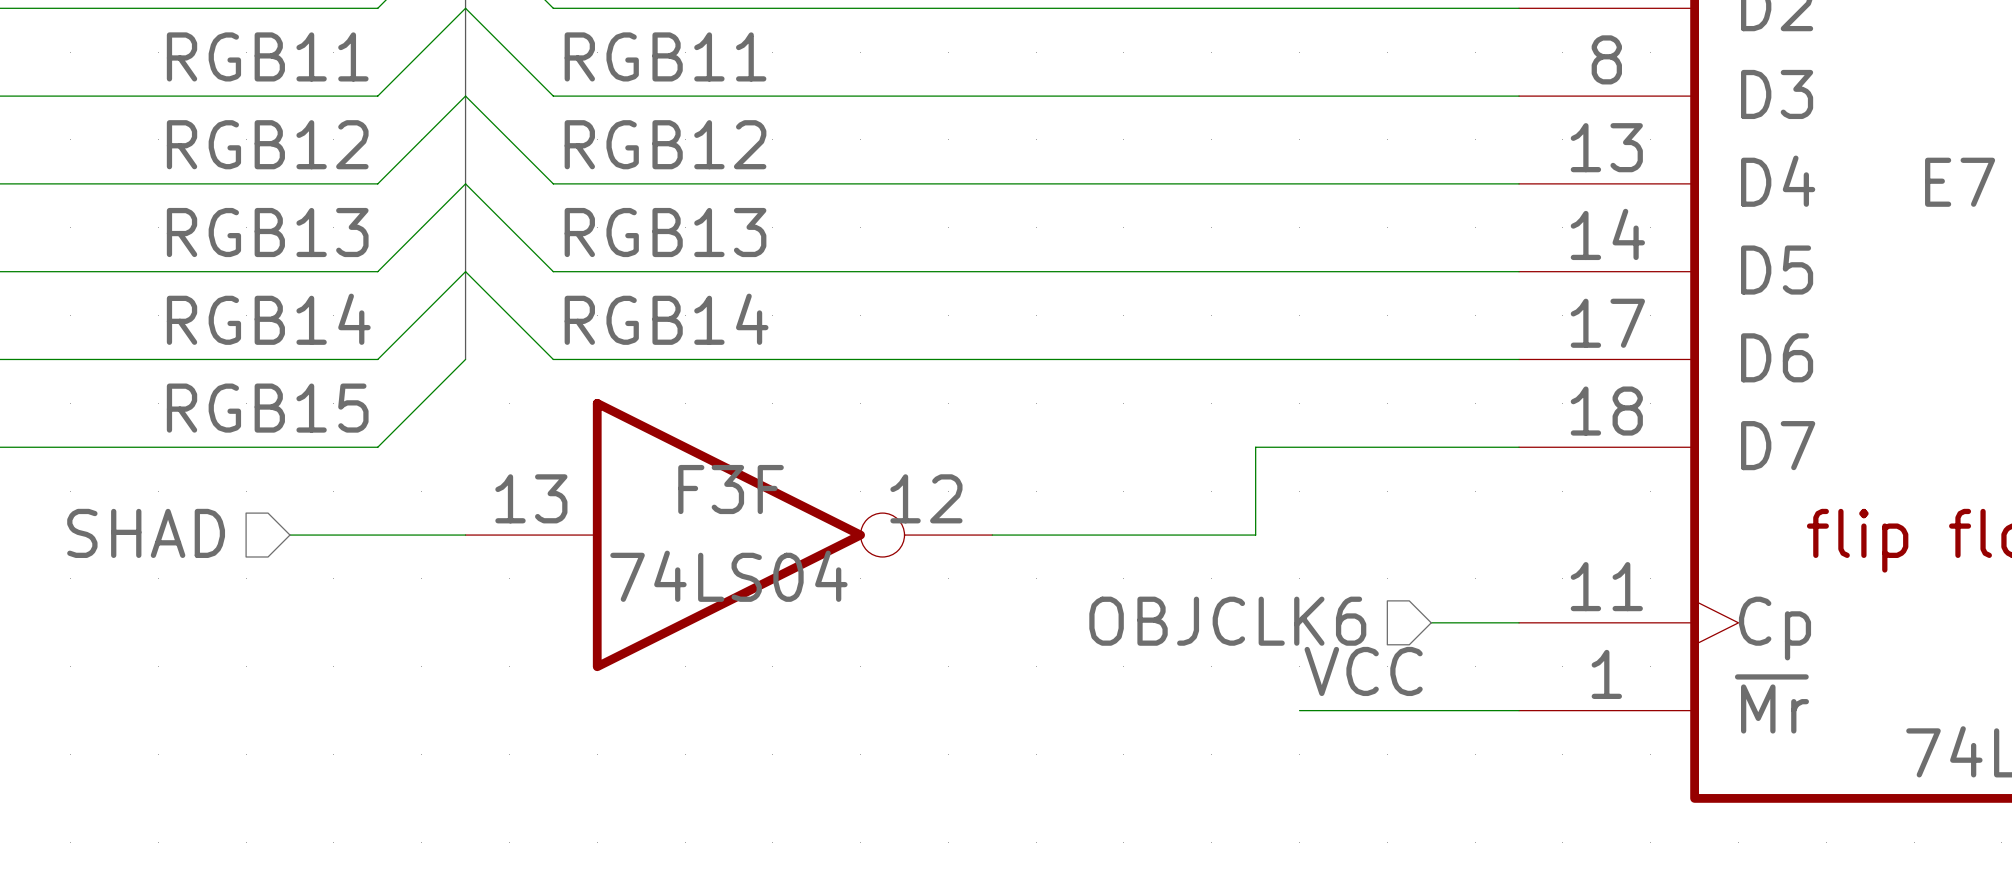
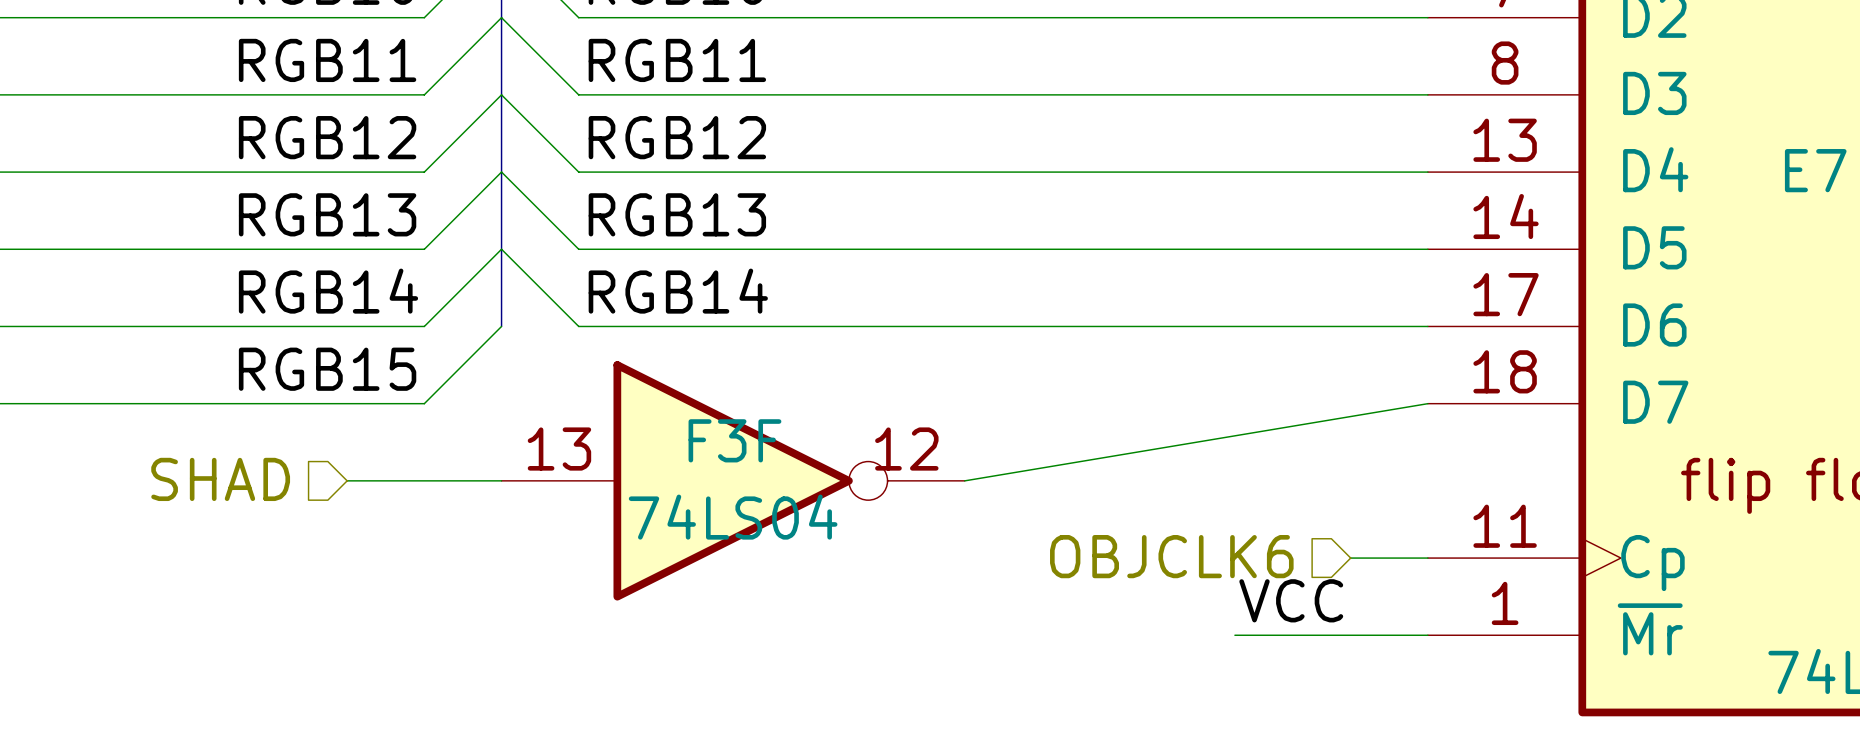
wire: (1519, 447) (1255, 447) (1255, 535) (992, 535) -> (1427, 403) (964, 480)

